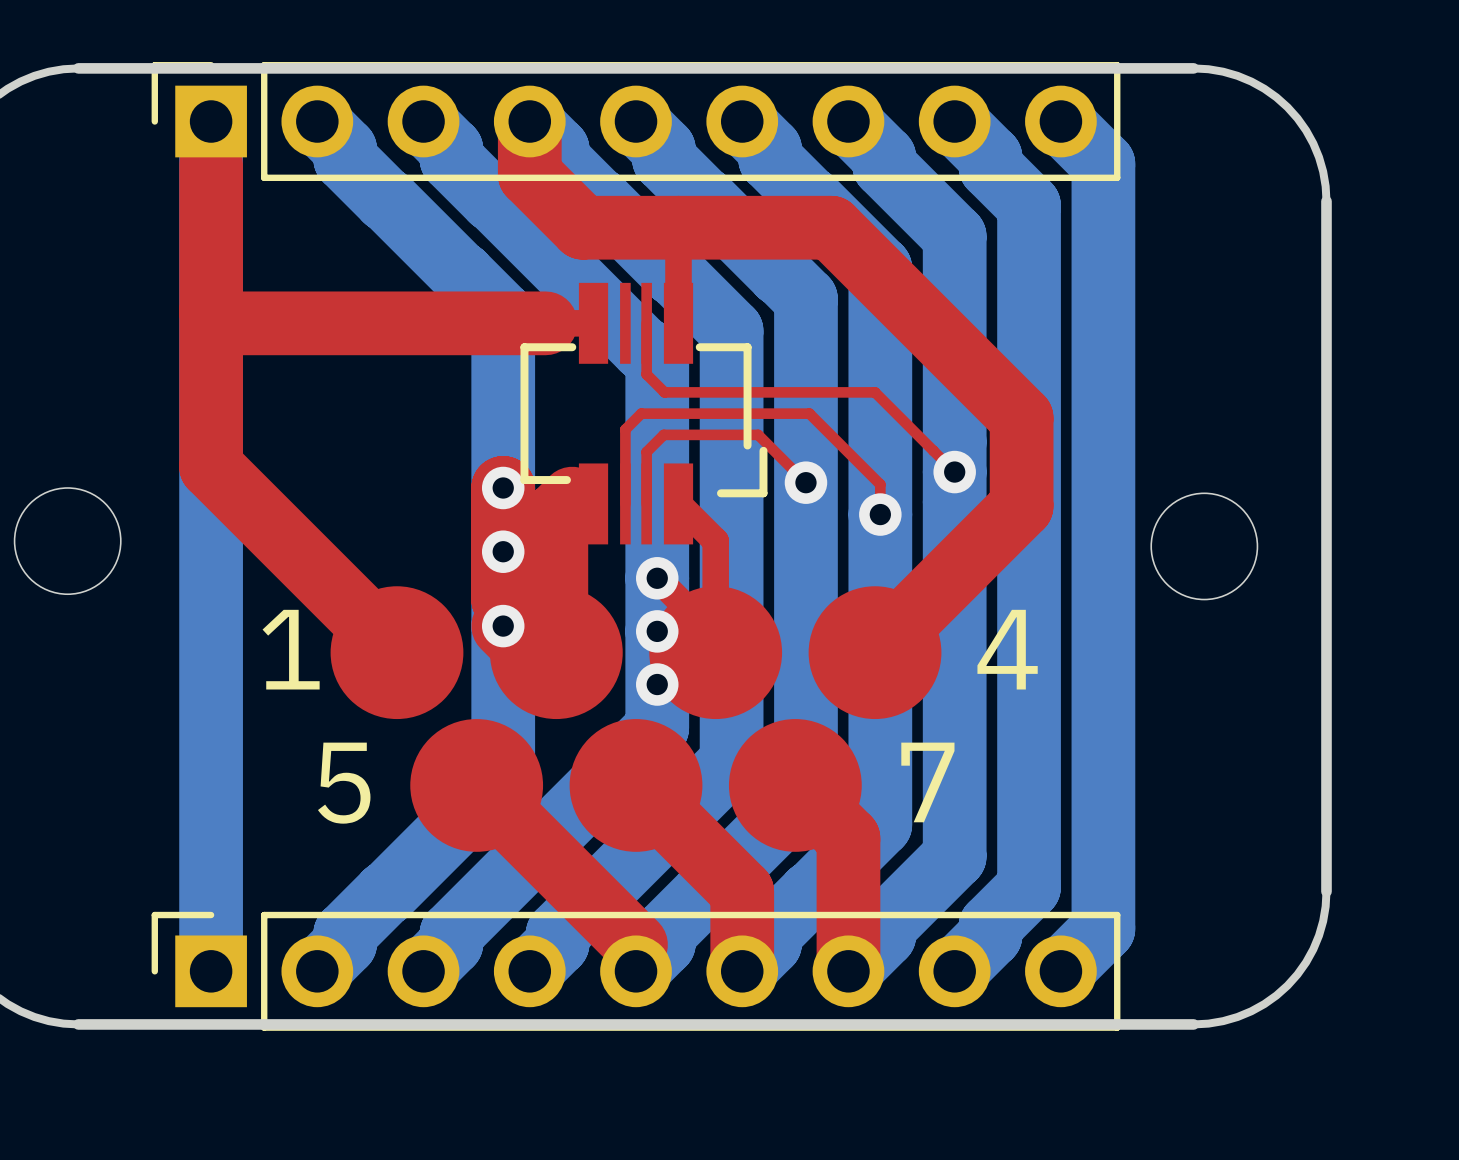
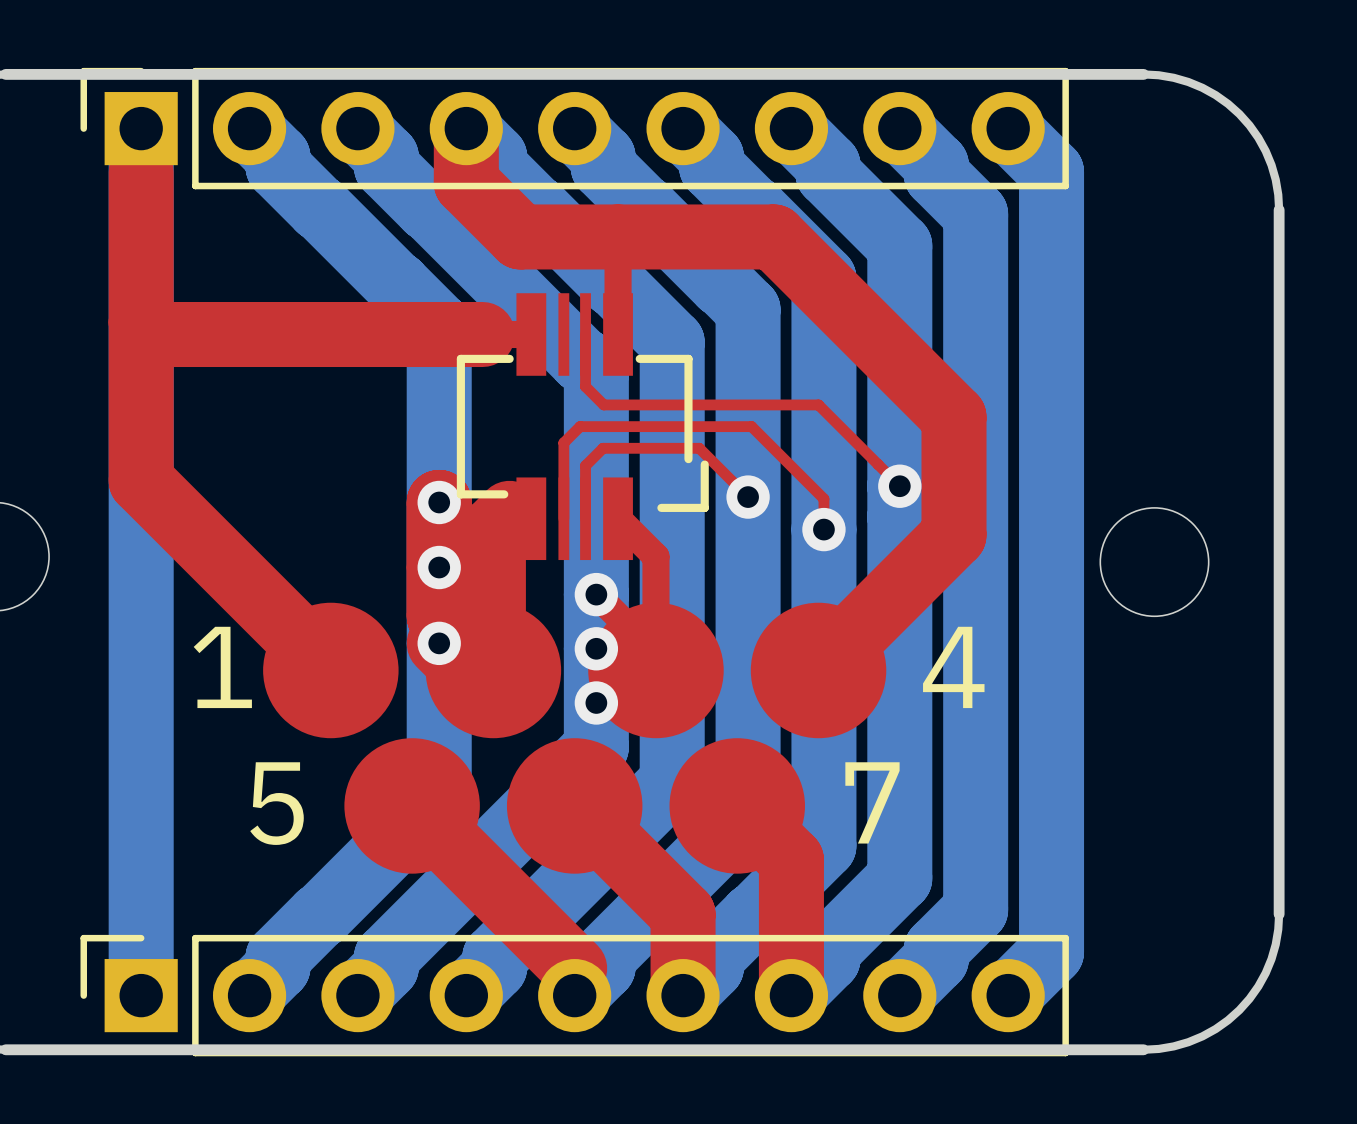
top track: (1007, 404) (1021, 418) (1021, 506) (1007, 519) -> (954, 417) (954, 535)

